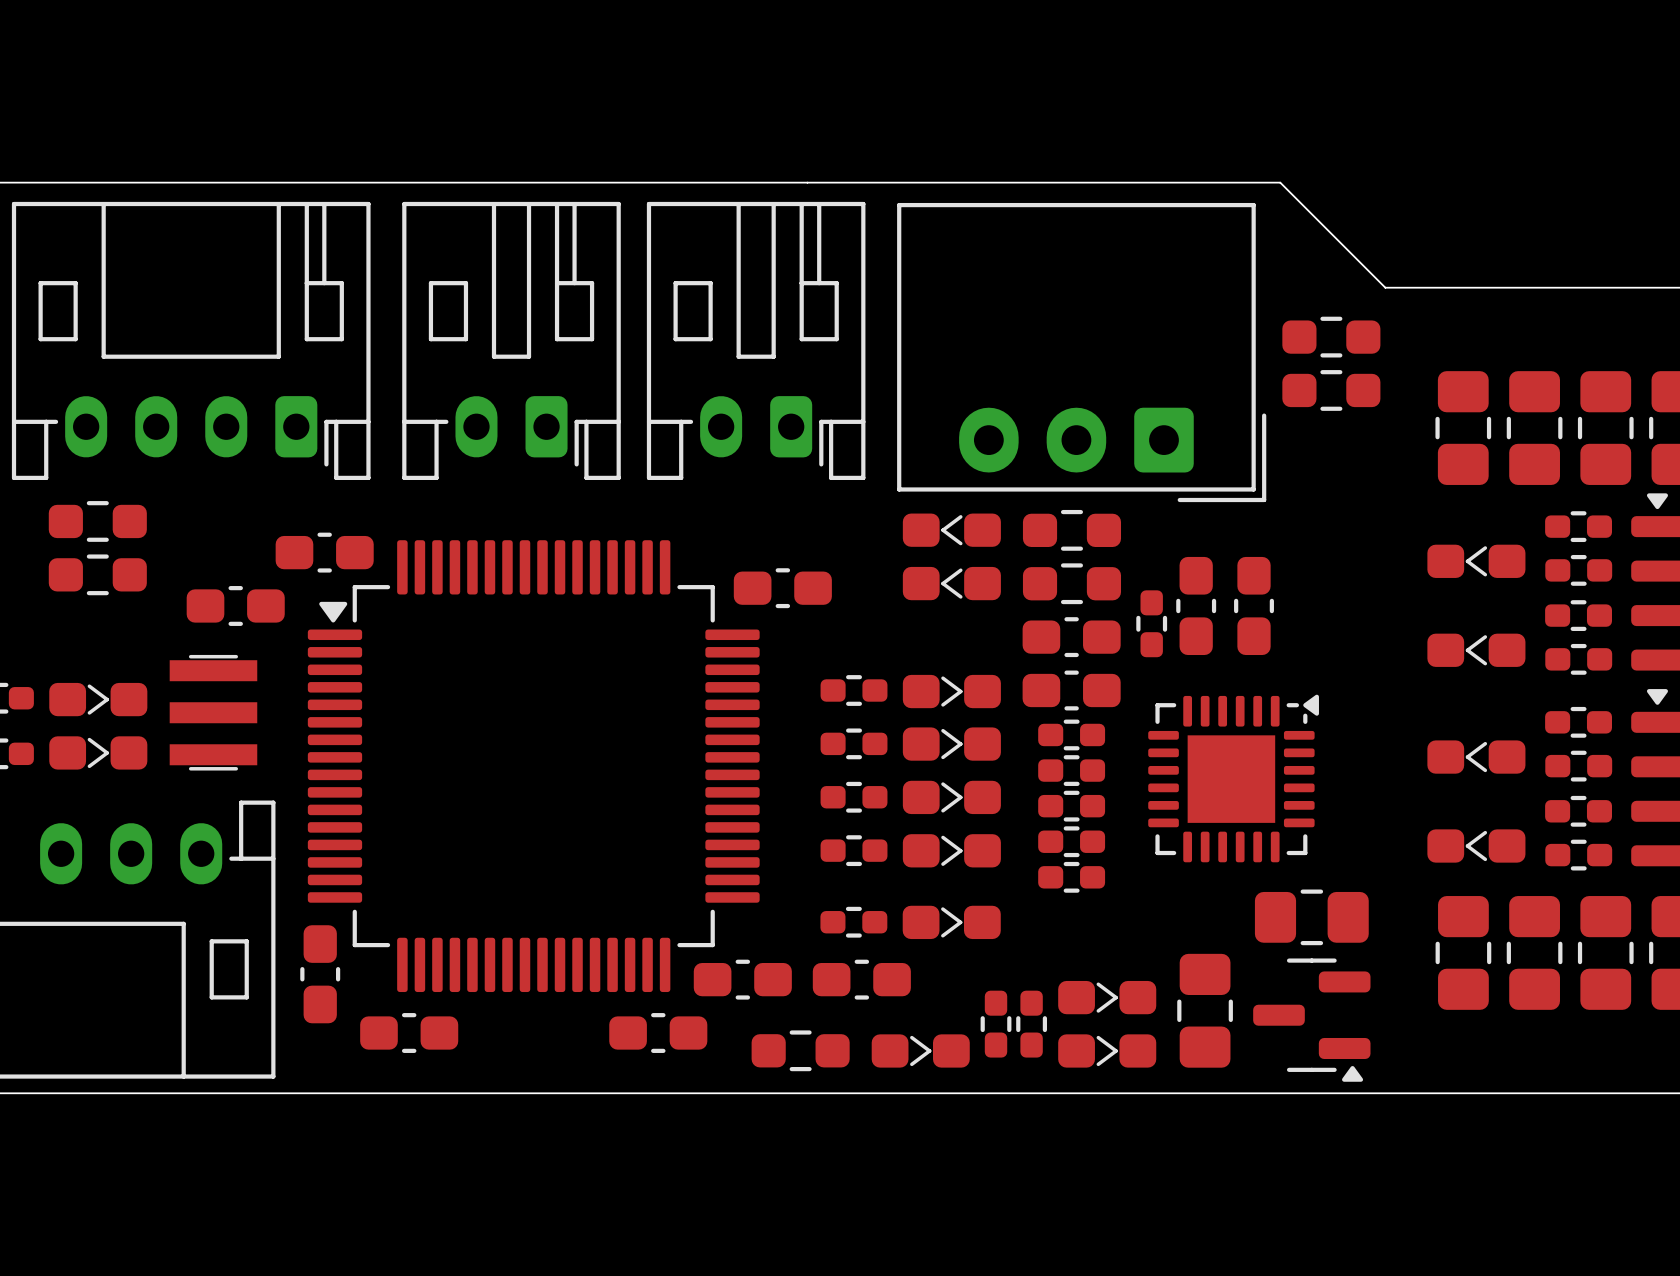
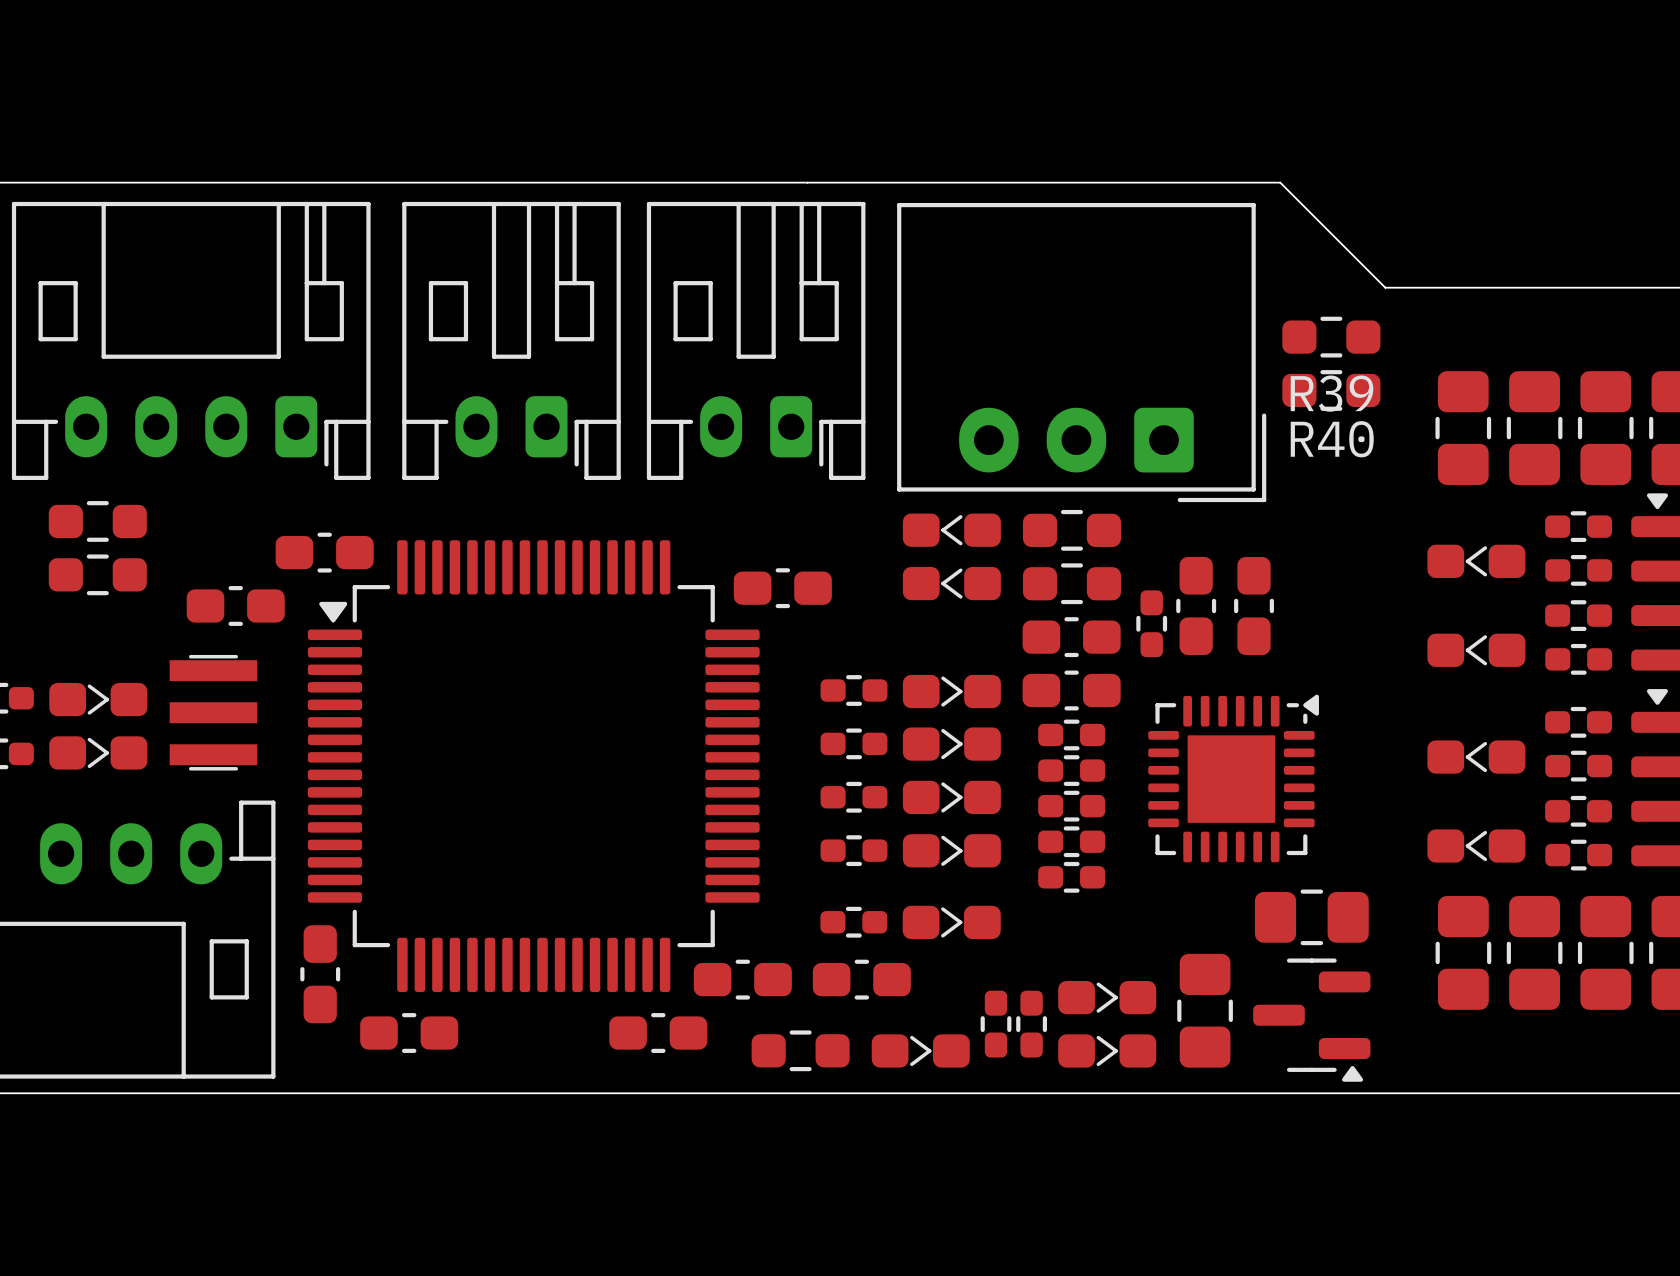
R39 name: none -> R39 (1332, 393)
R40 name: none -> R40 (1332, 439)

